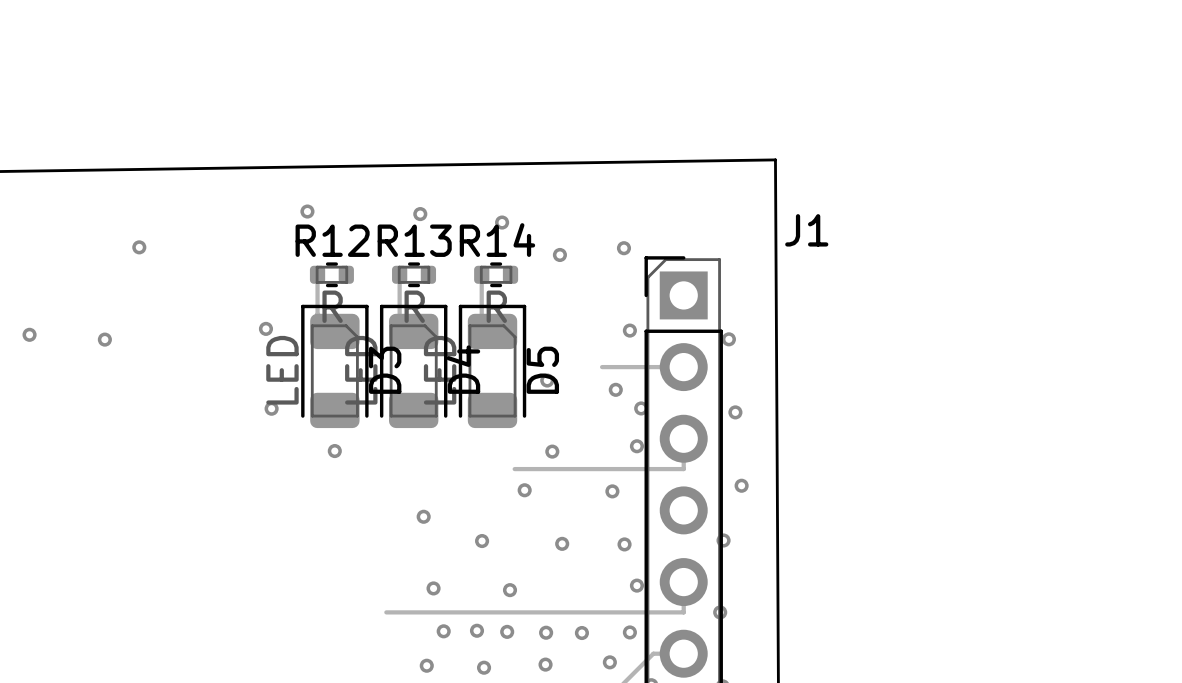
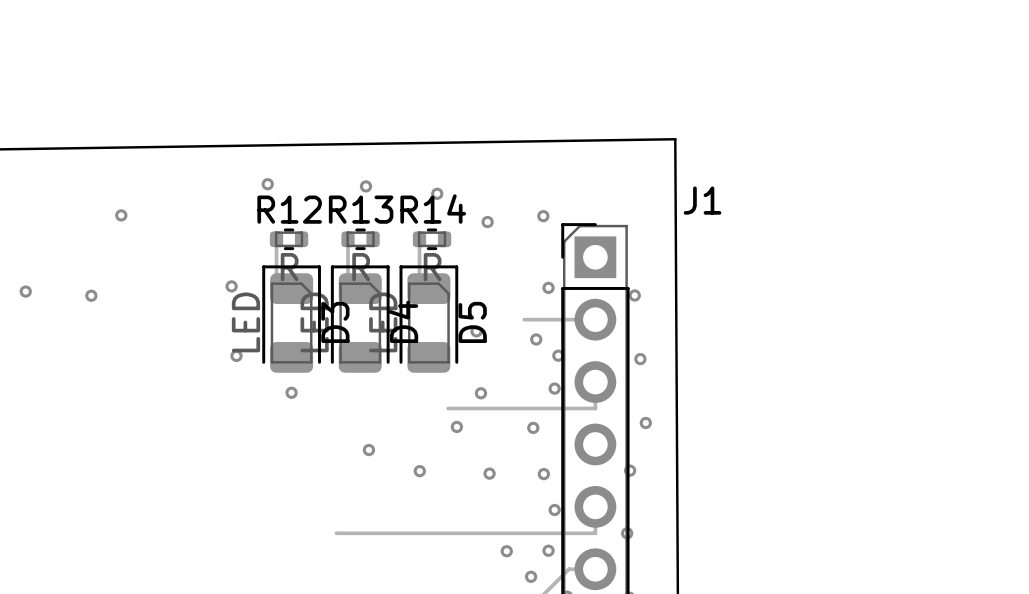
via: (433, 588) -> none
via: (510, 590) -> none
via: (476, 630) -> none
via: (443, 631) -> none
via: (507, 631) -> none
via: (546, 632) -> none
via: (545, 664) -> none
via: (426, 665) -> none
via: (484, 667) -> none

